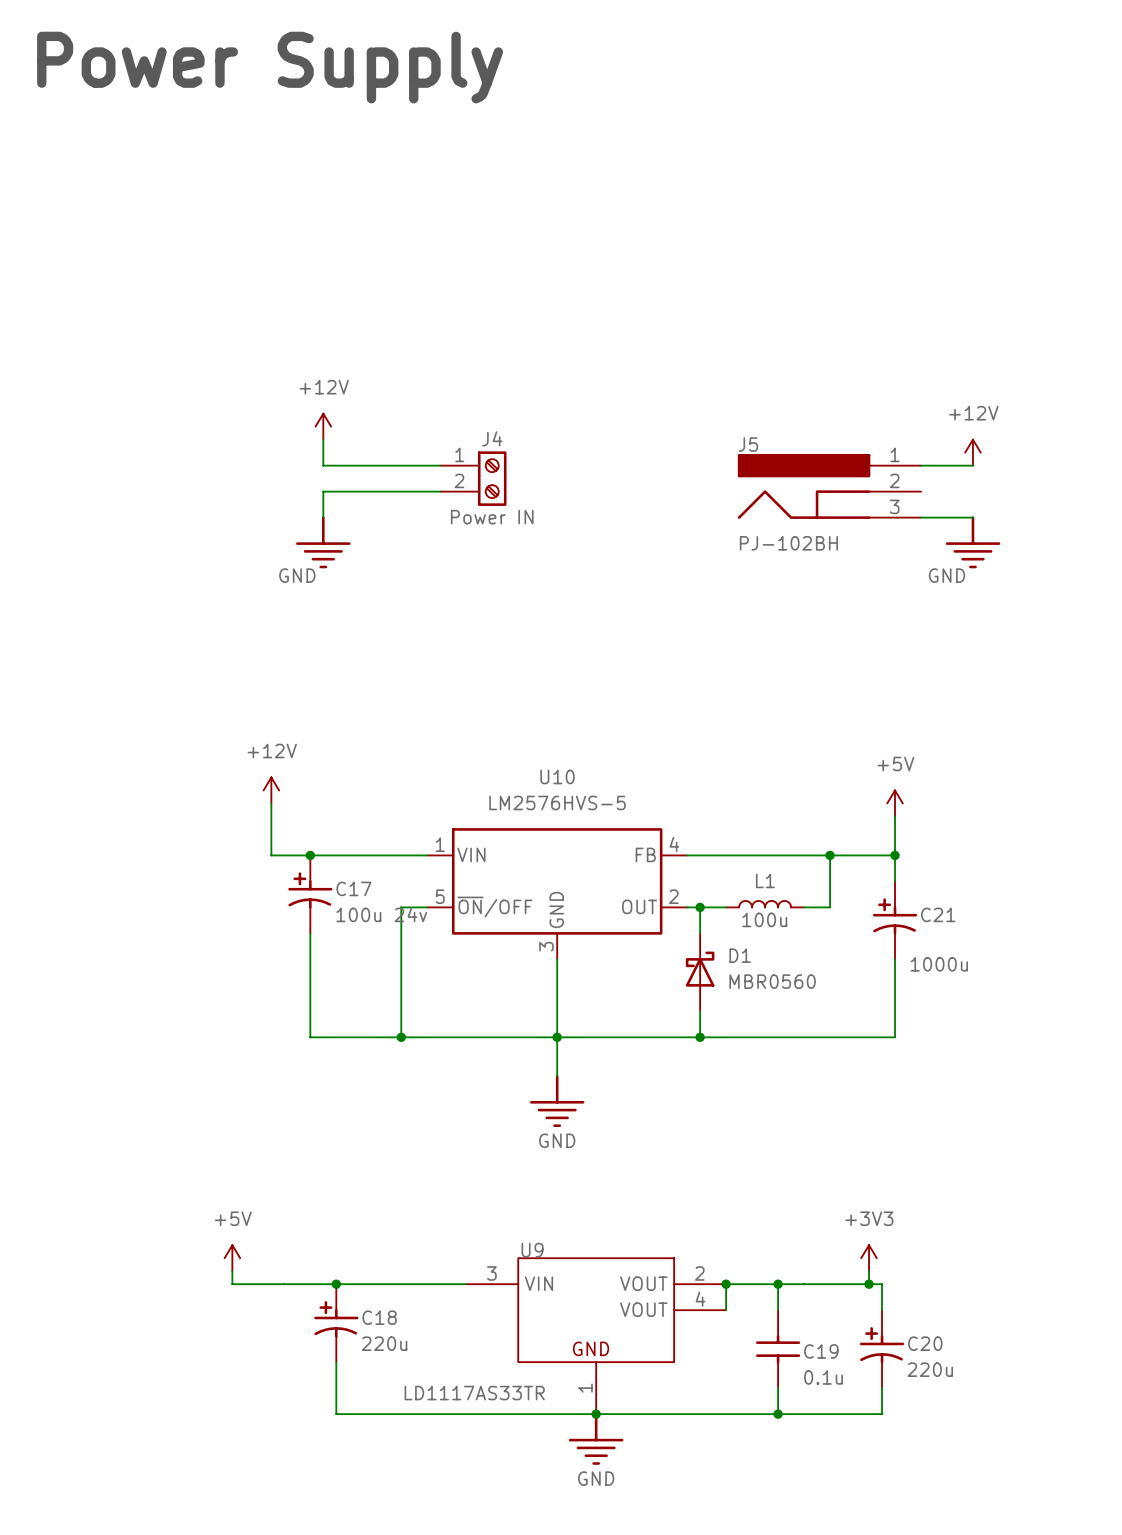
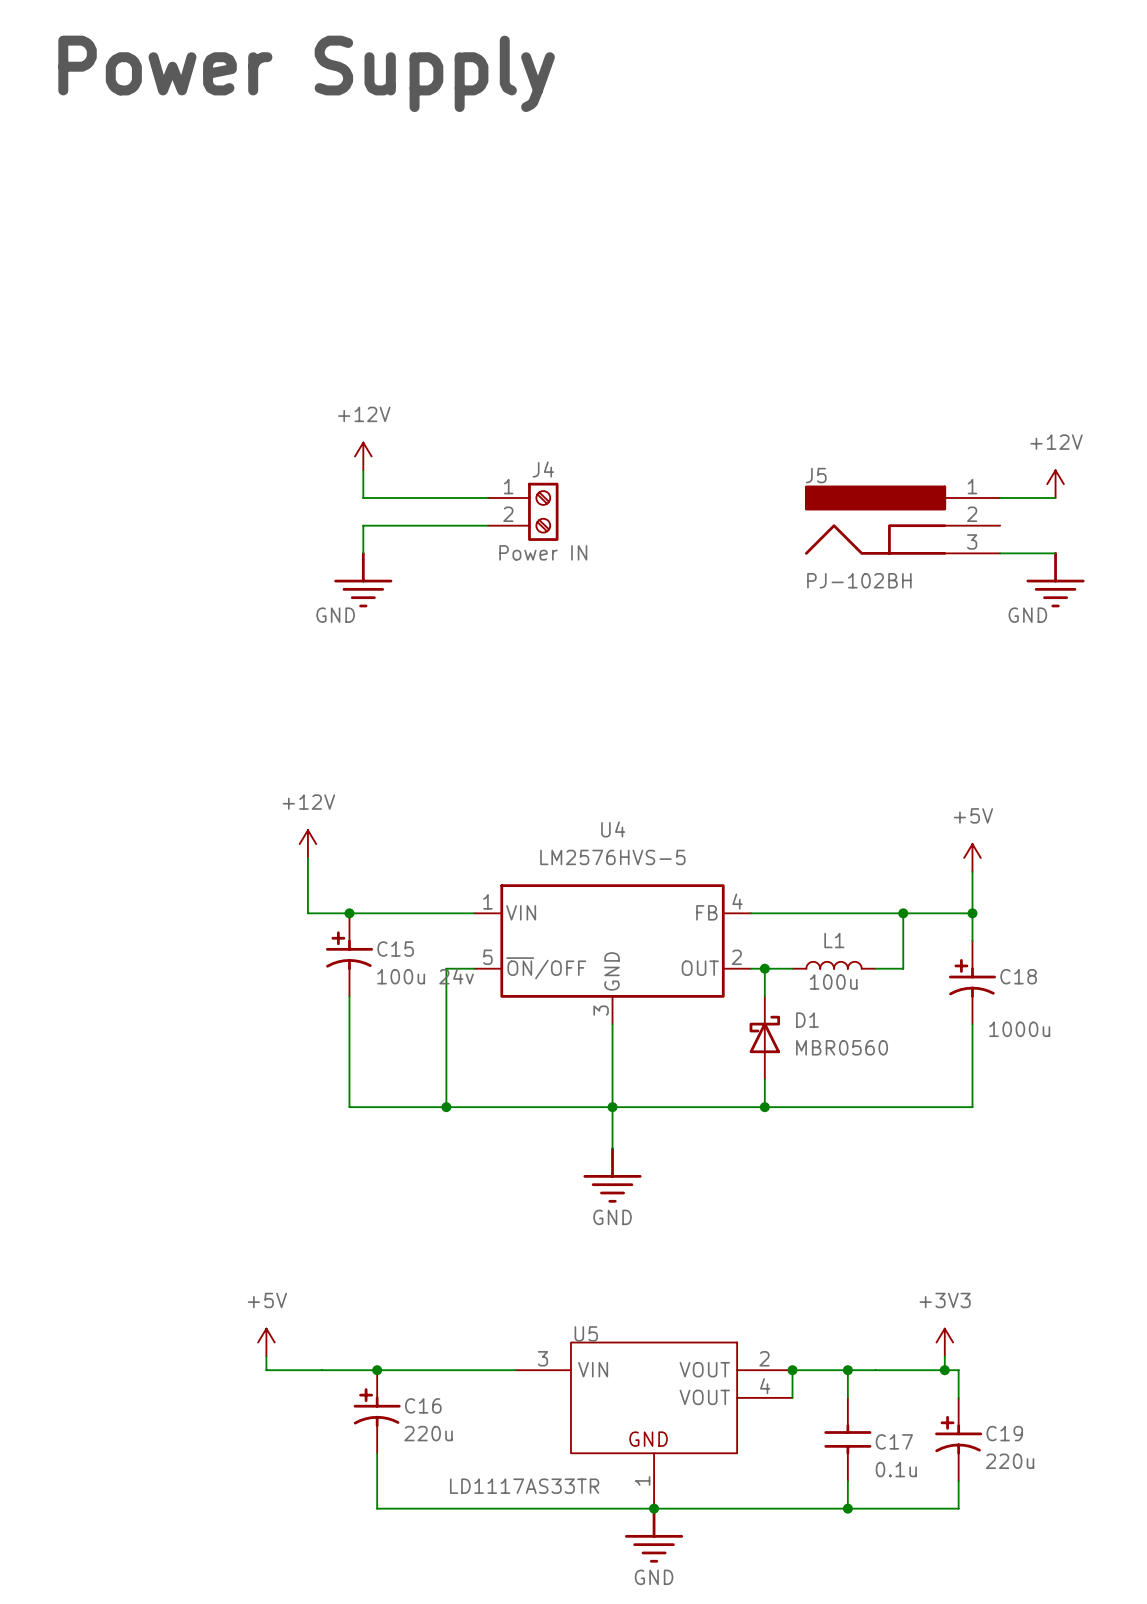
U10 name: U10 (557, 776) -> U4 (613, 829)
C17 name: C17 (353, 888) -> C15 (395, 949)
C21 name: C21 (938, 914) -> C18 (1018, 976)
U9 name: U9 (532, 1250) -> U5 (586, 1333)
C18 name: C18 (379, 1317) -> C16 (423, 1405)
C20 name: C20 (925, 1343) -> C19 (1004, 1433)
C19 name: C19 (821, 1351) -> C17 (894, 1441)

